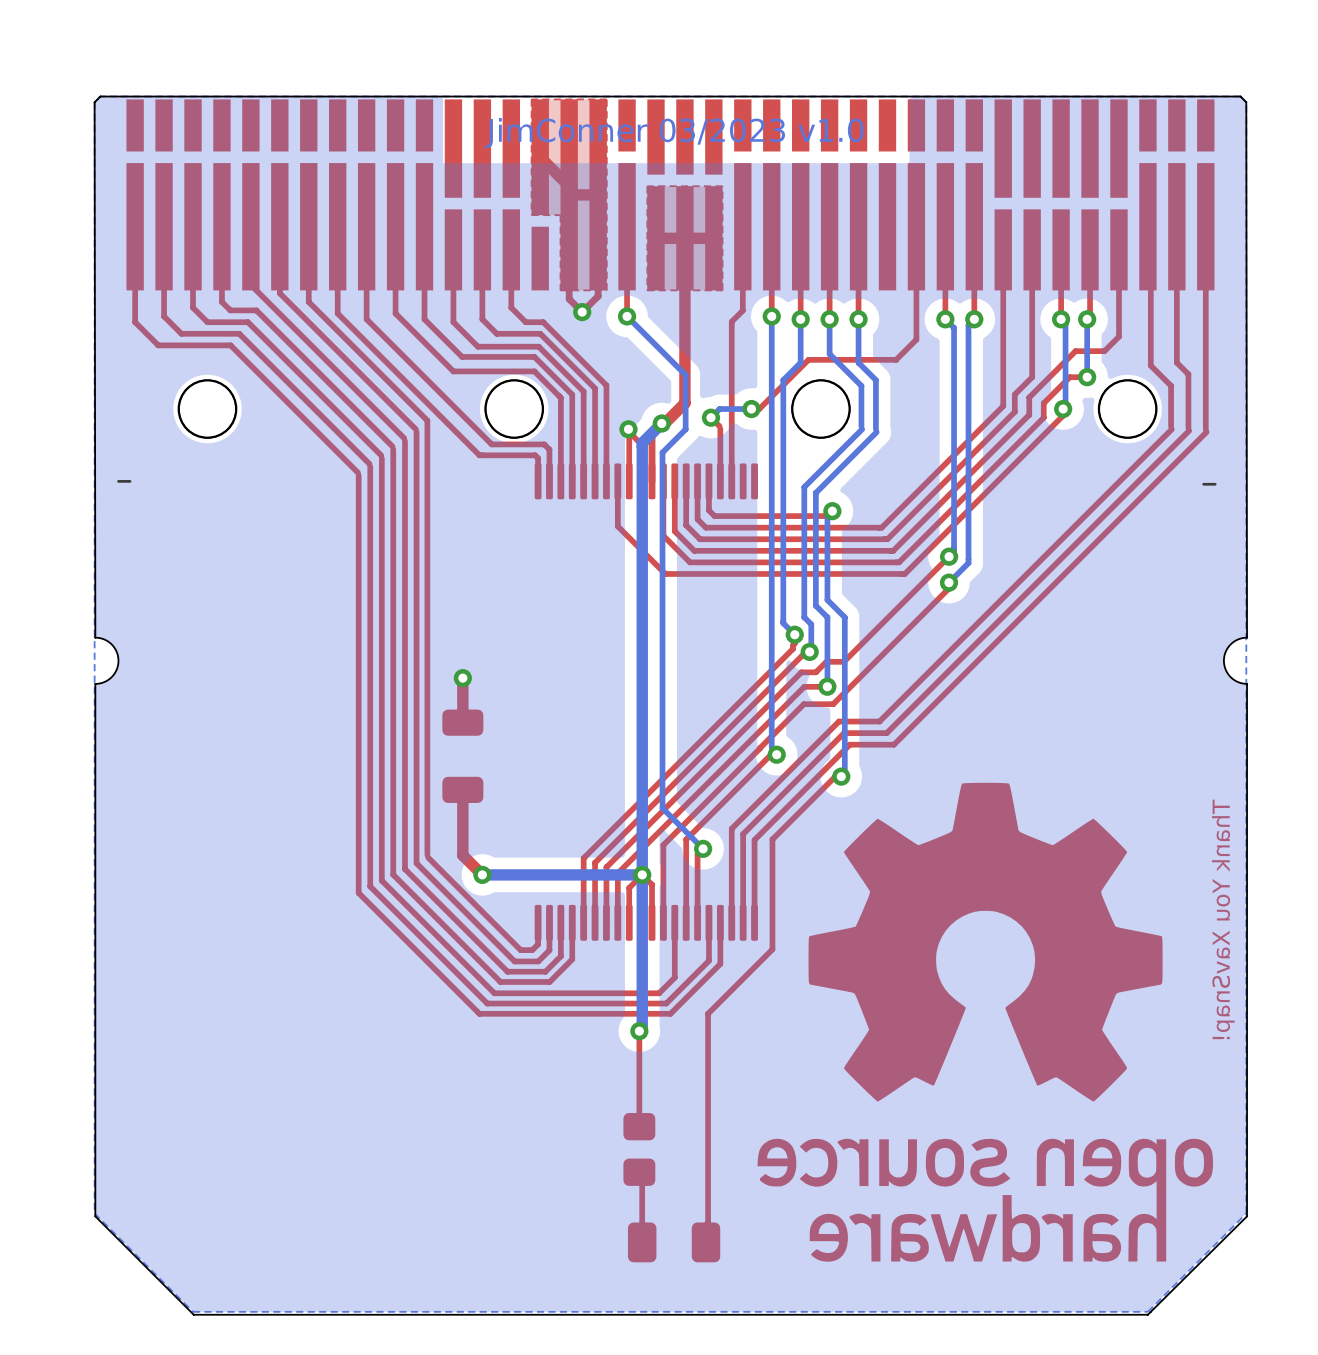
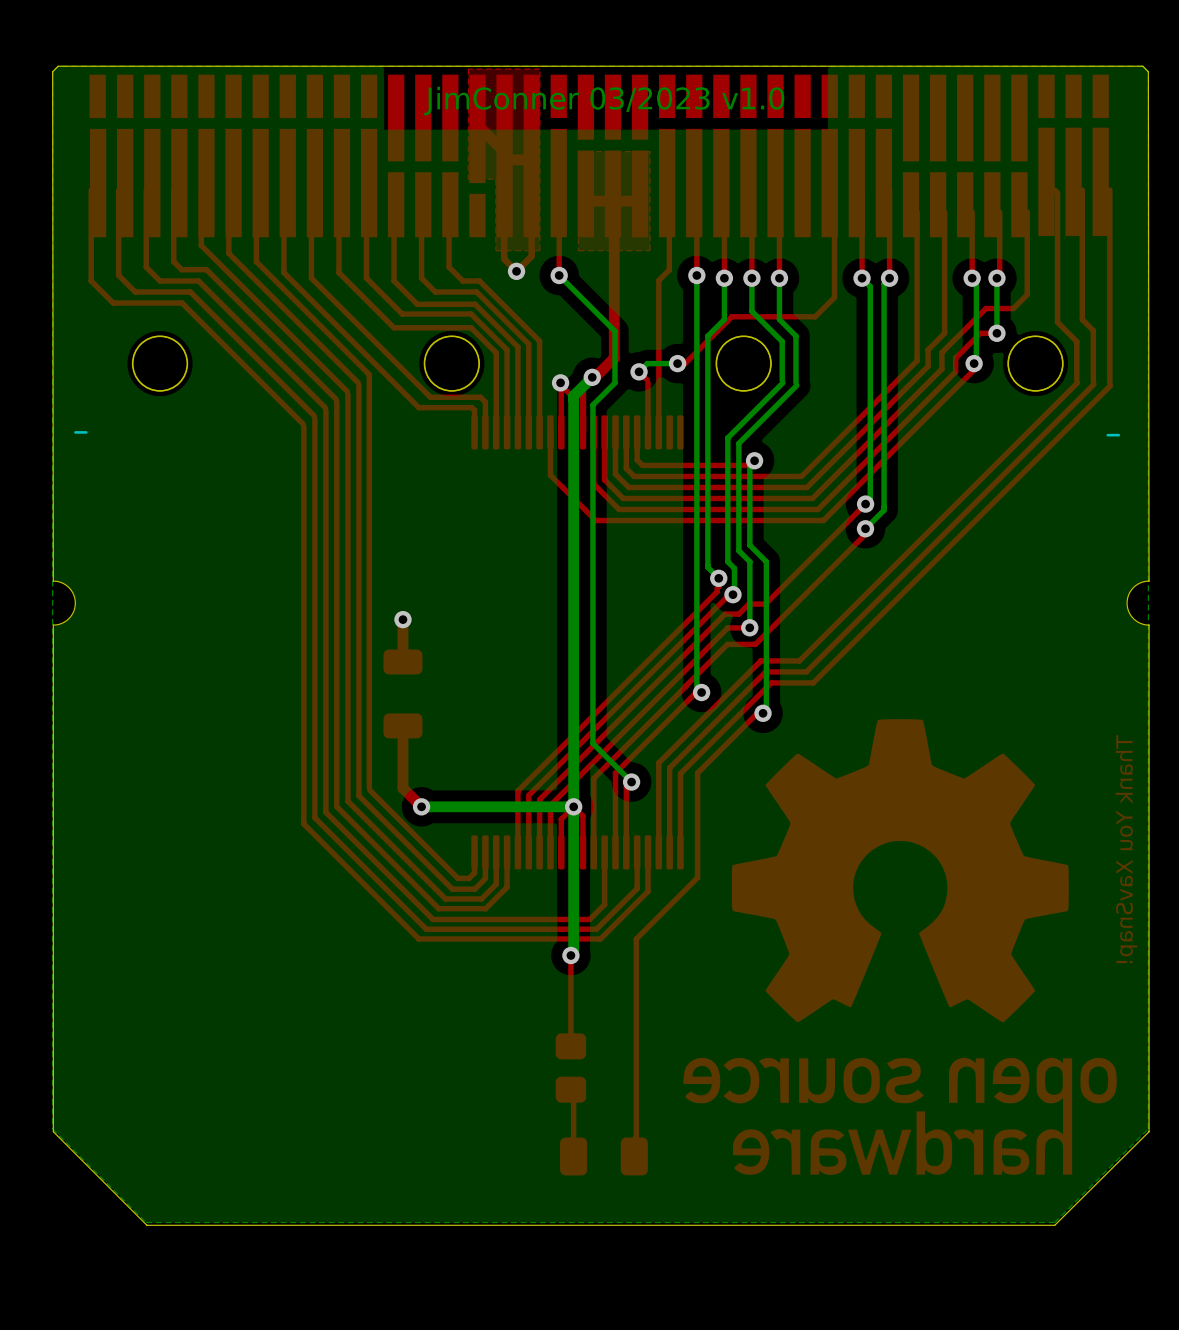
part footprint: [126, 99, 1215, 291] -> [89, 74, 1109, 238]

